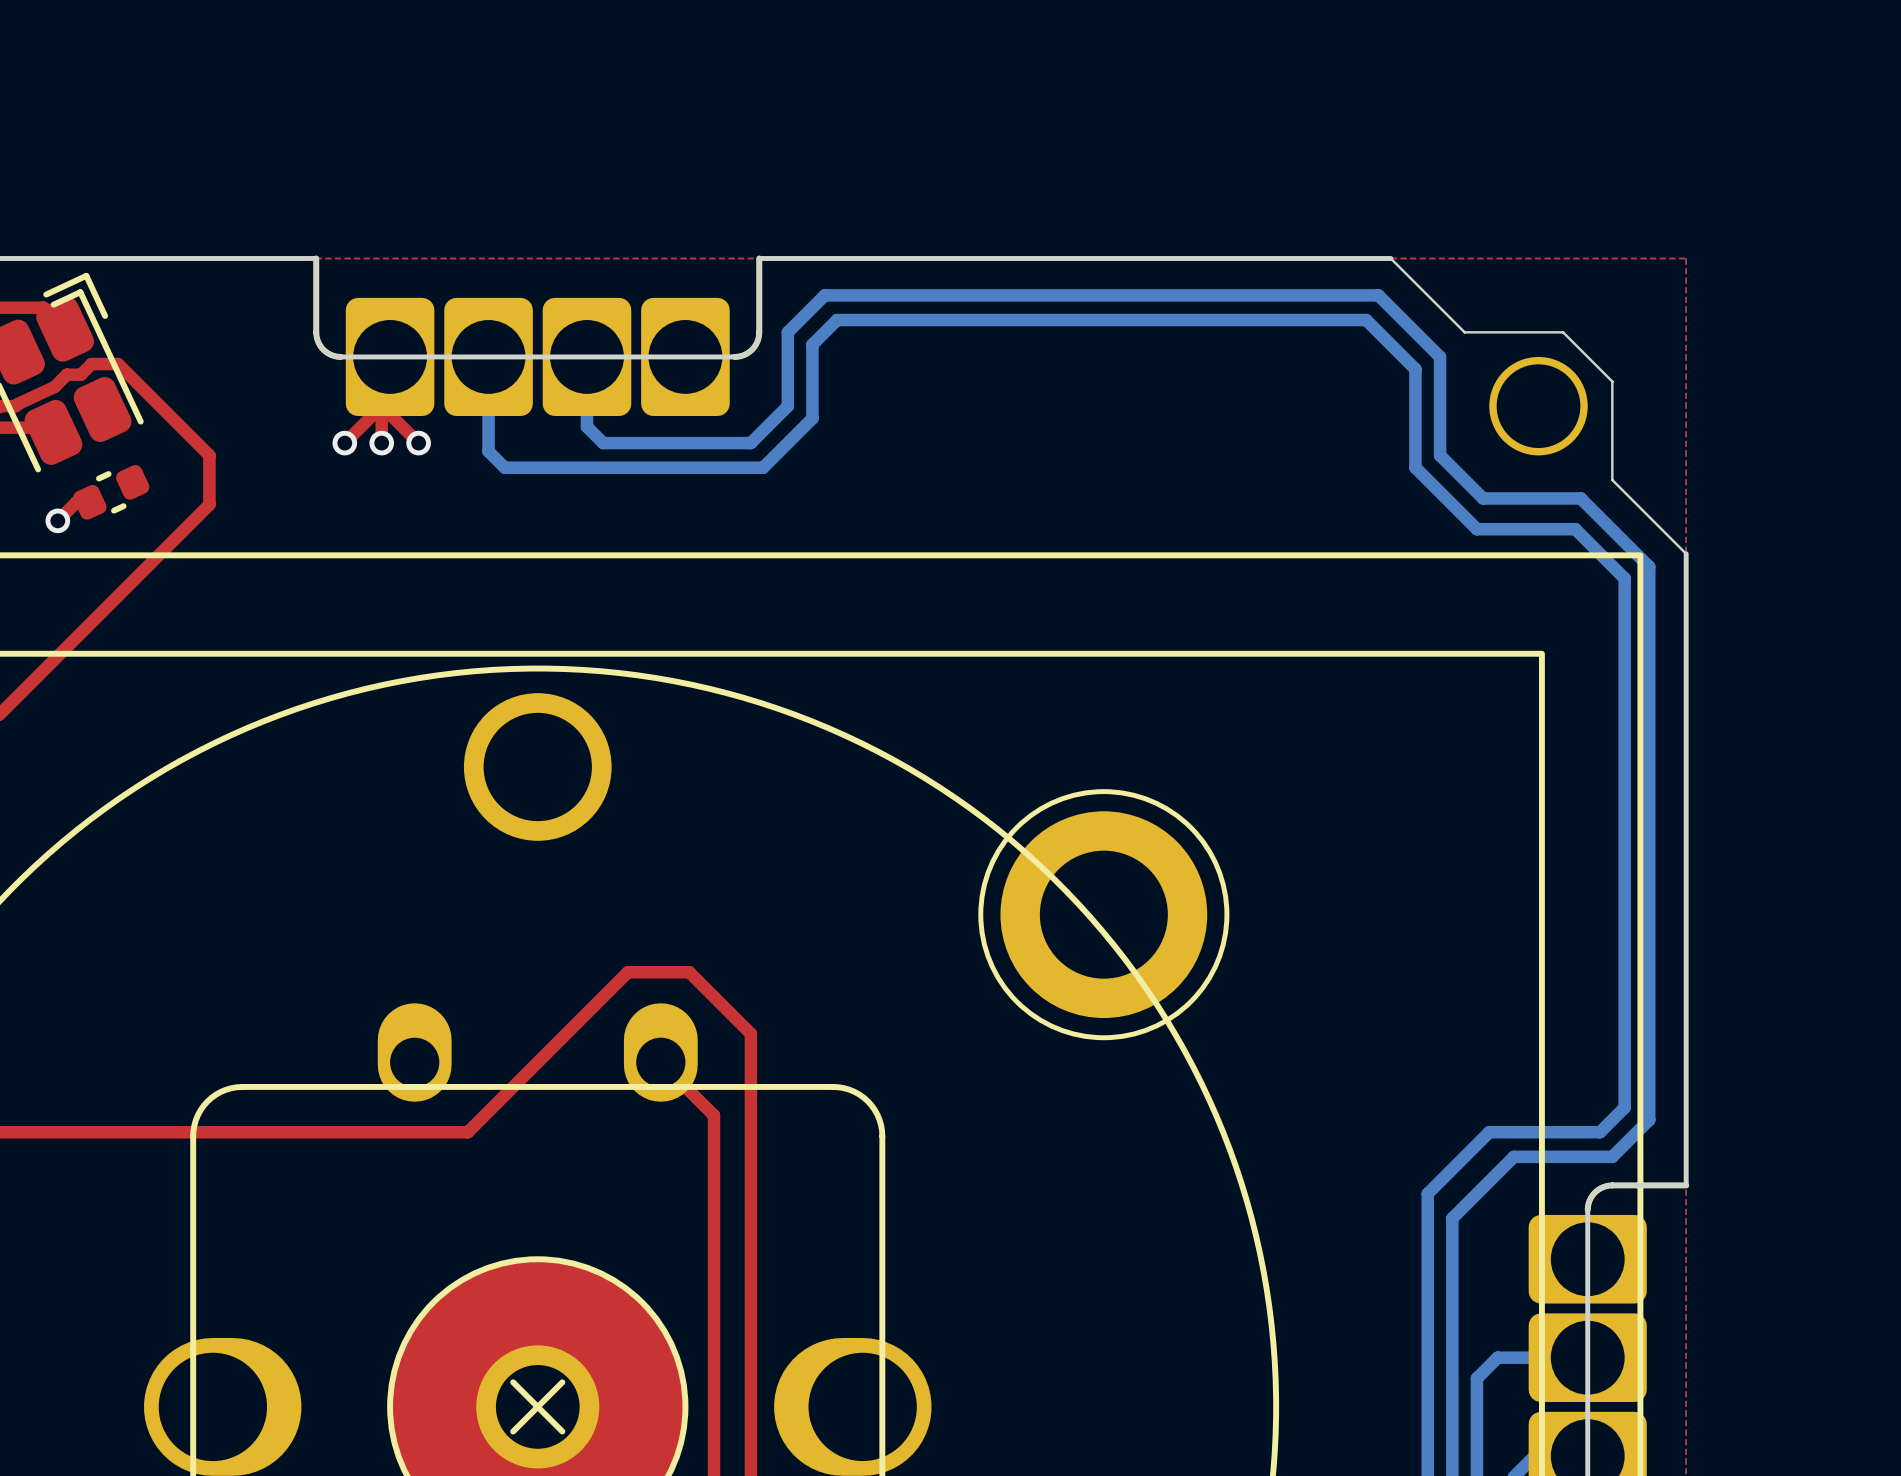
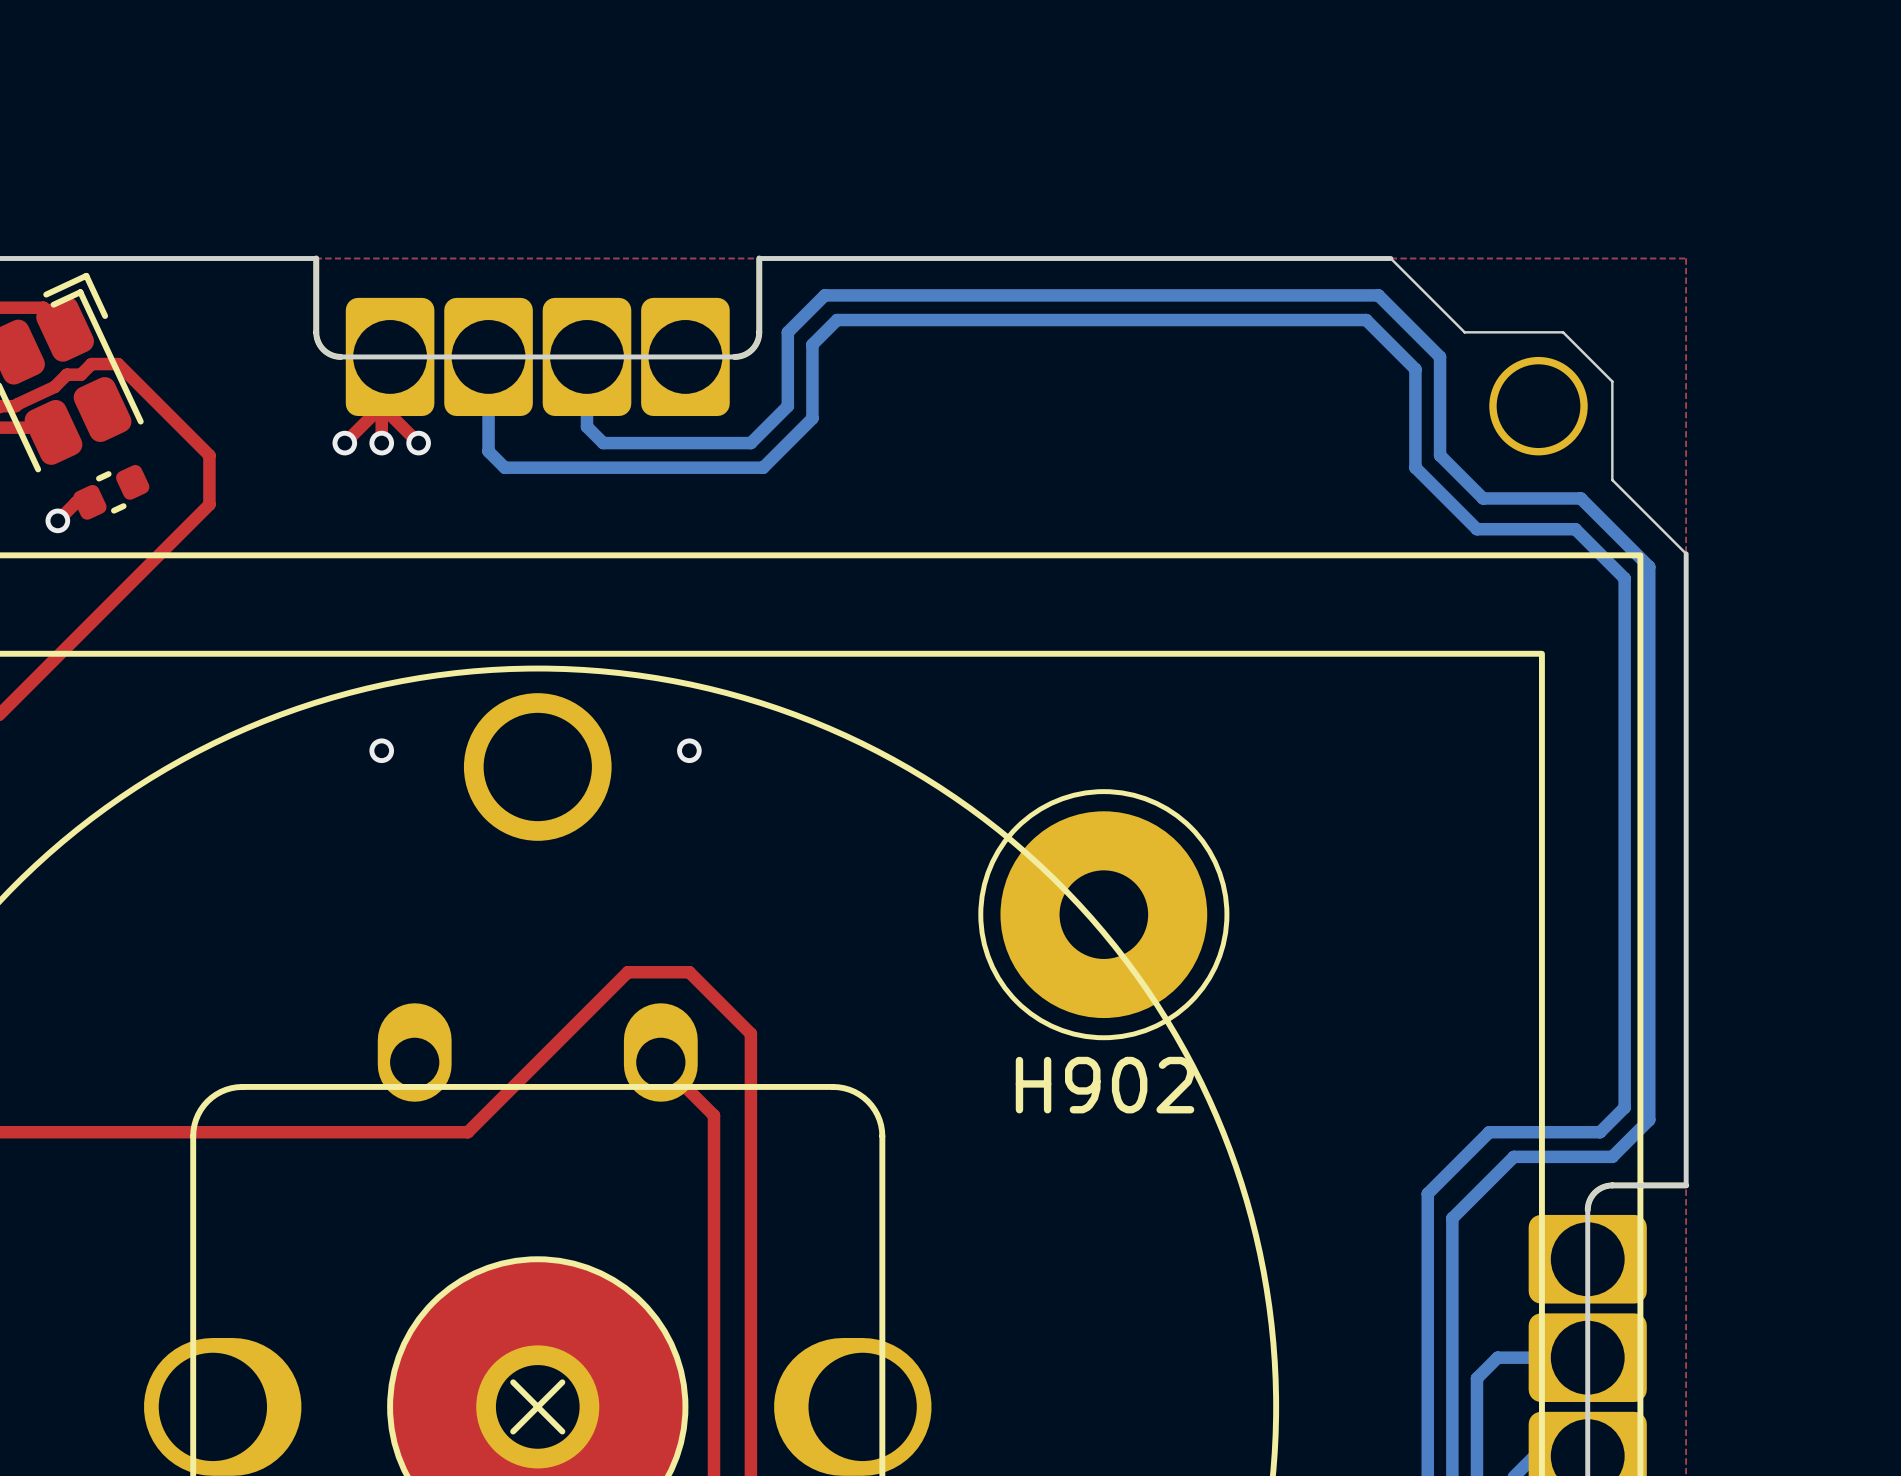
via: none -> (381, 750)
via: none -> (689, 750)
part: (1103, 914) -> none
H902: none -> (1103, 914)

